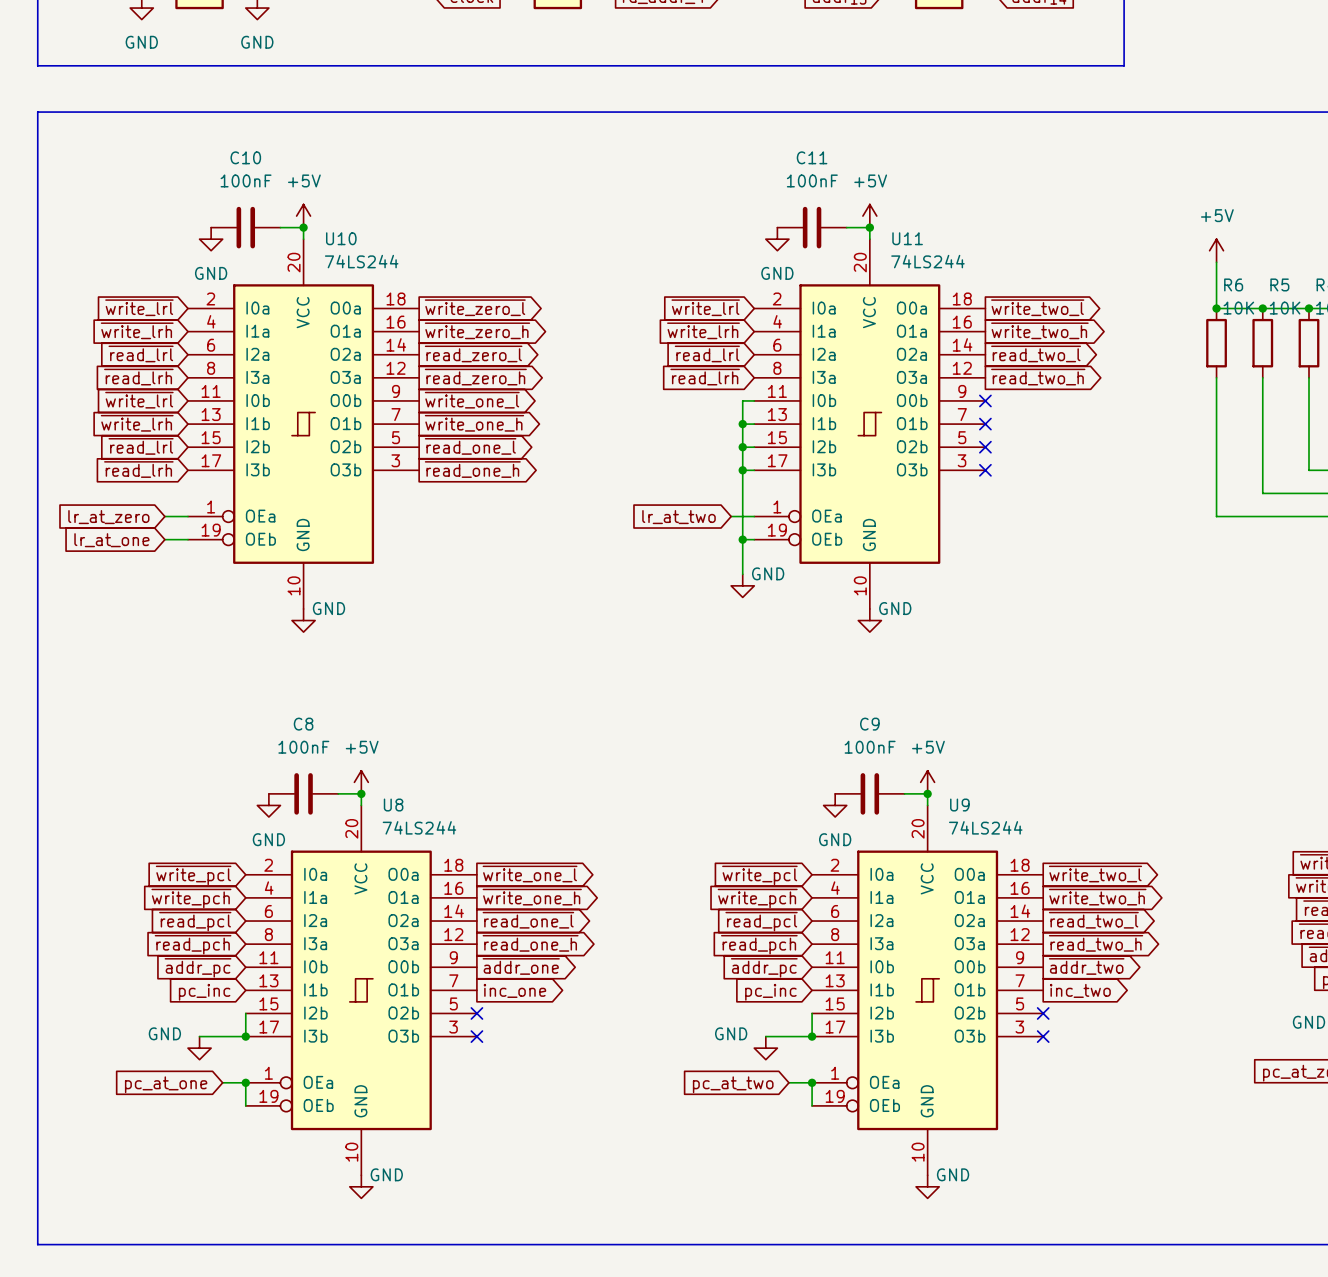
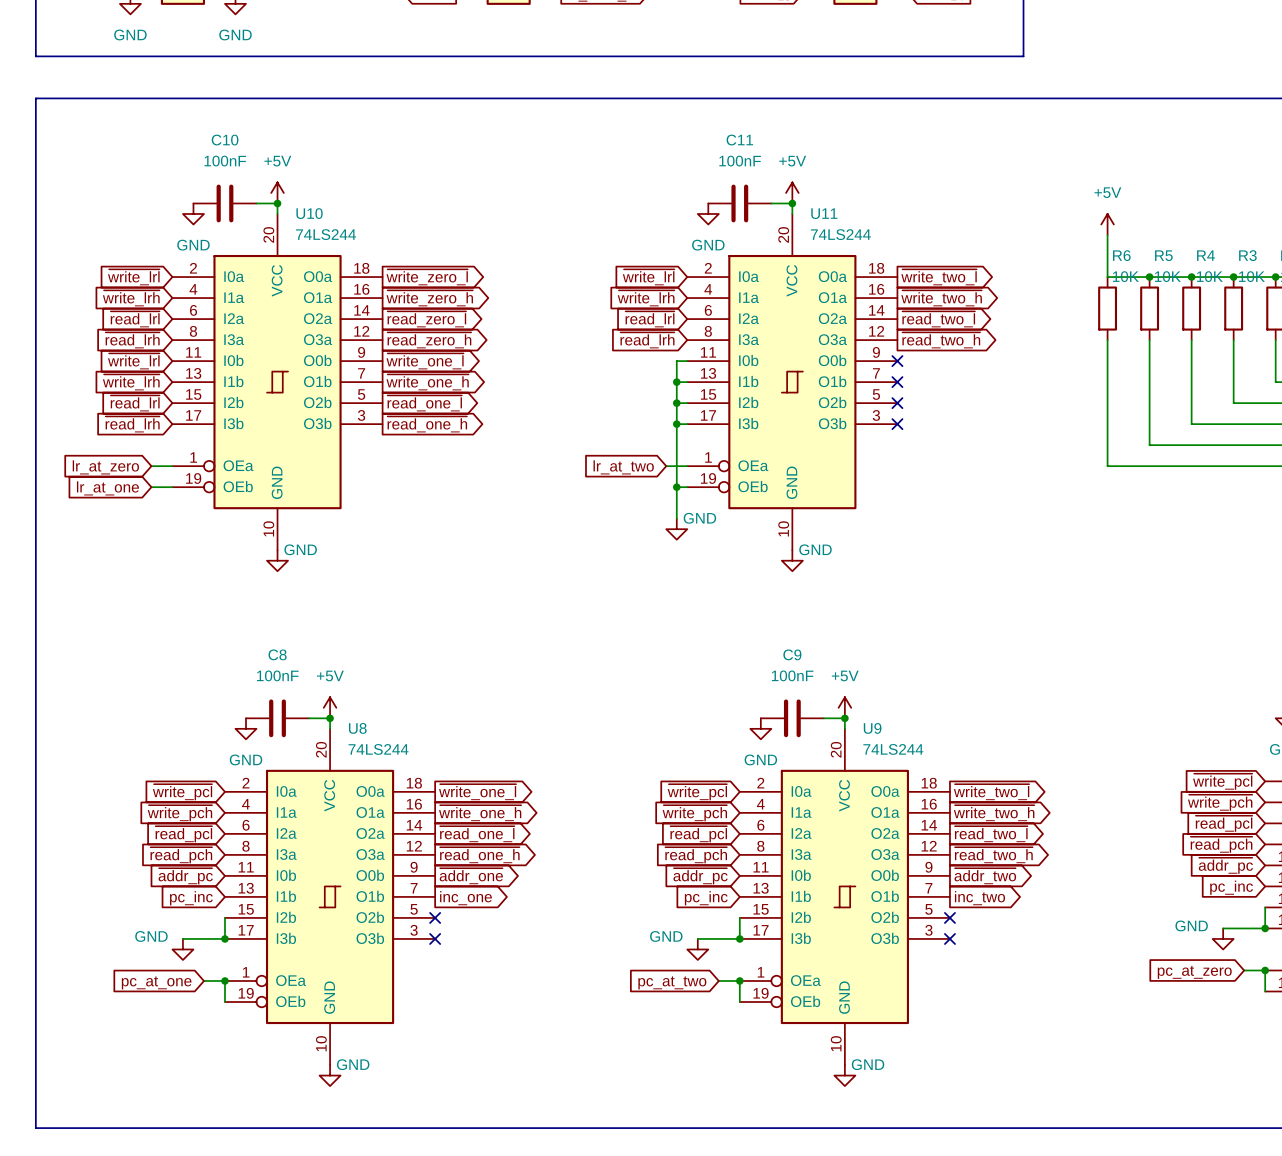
junction: (1216, 308) -> none

